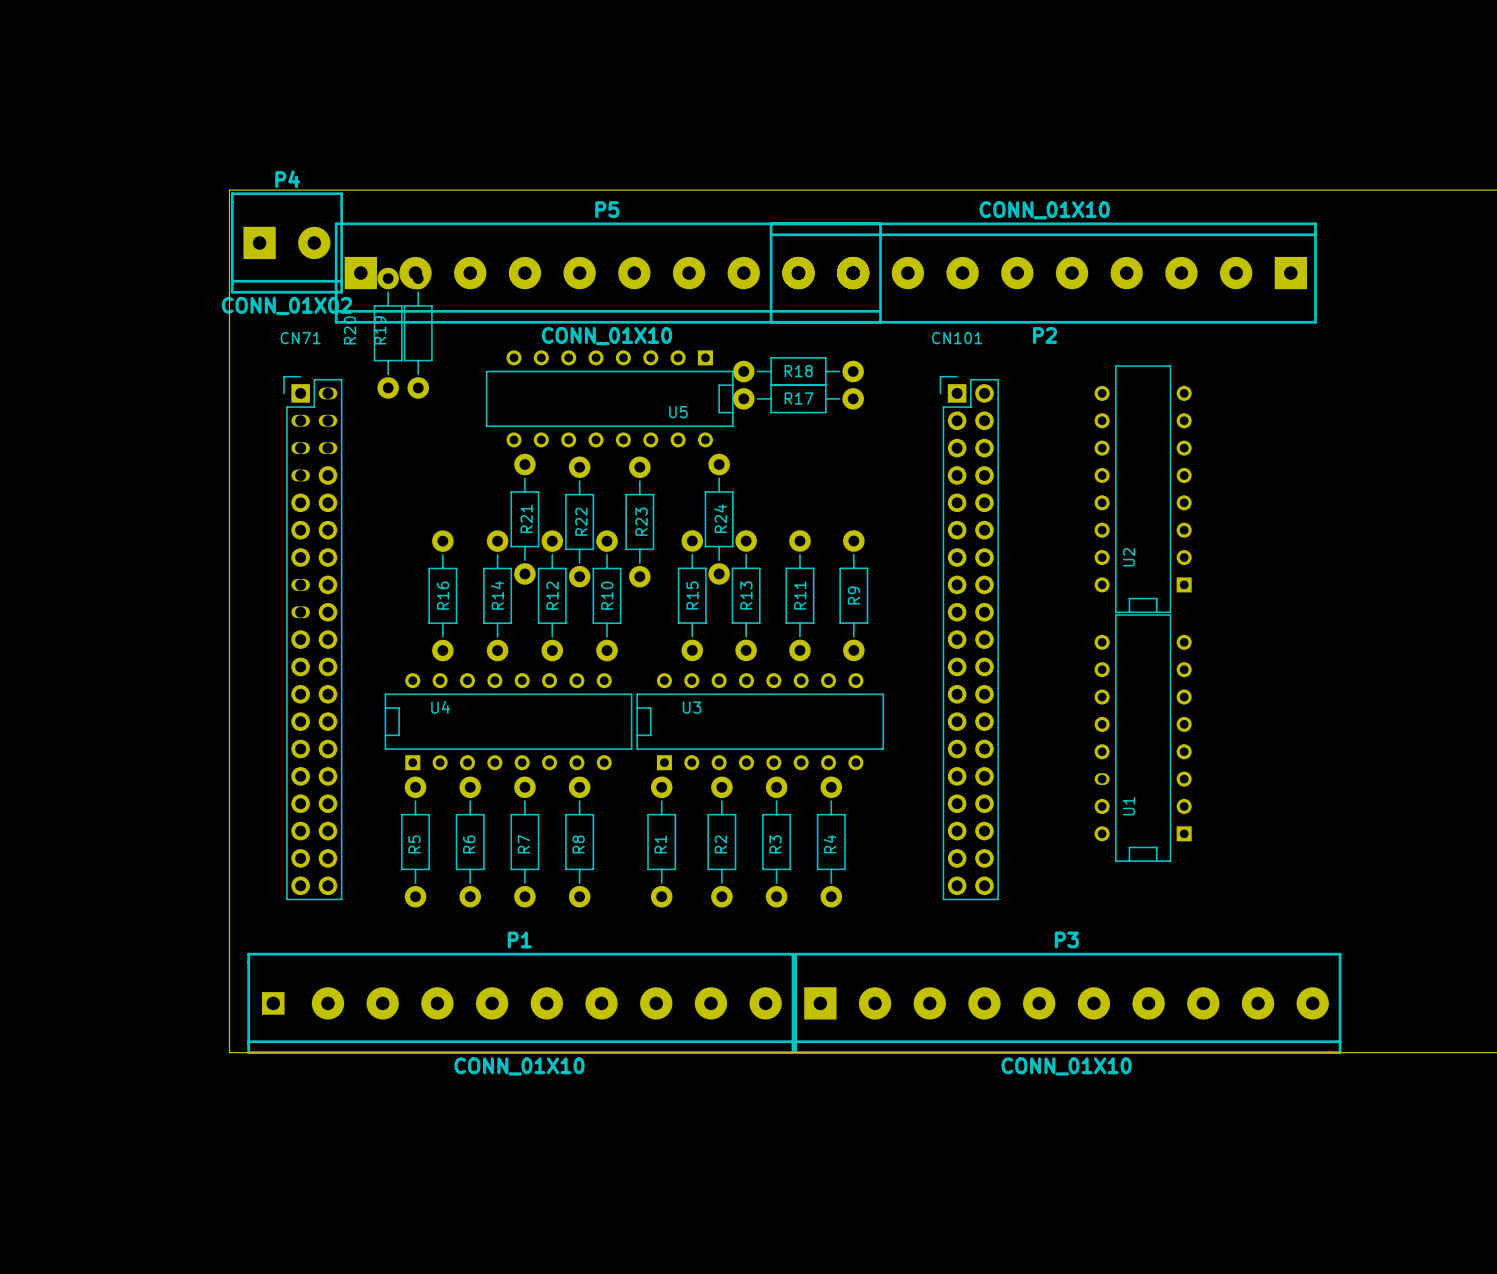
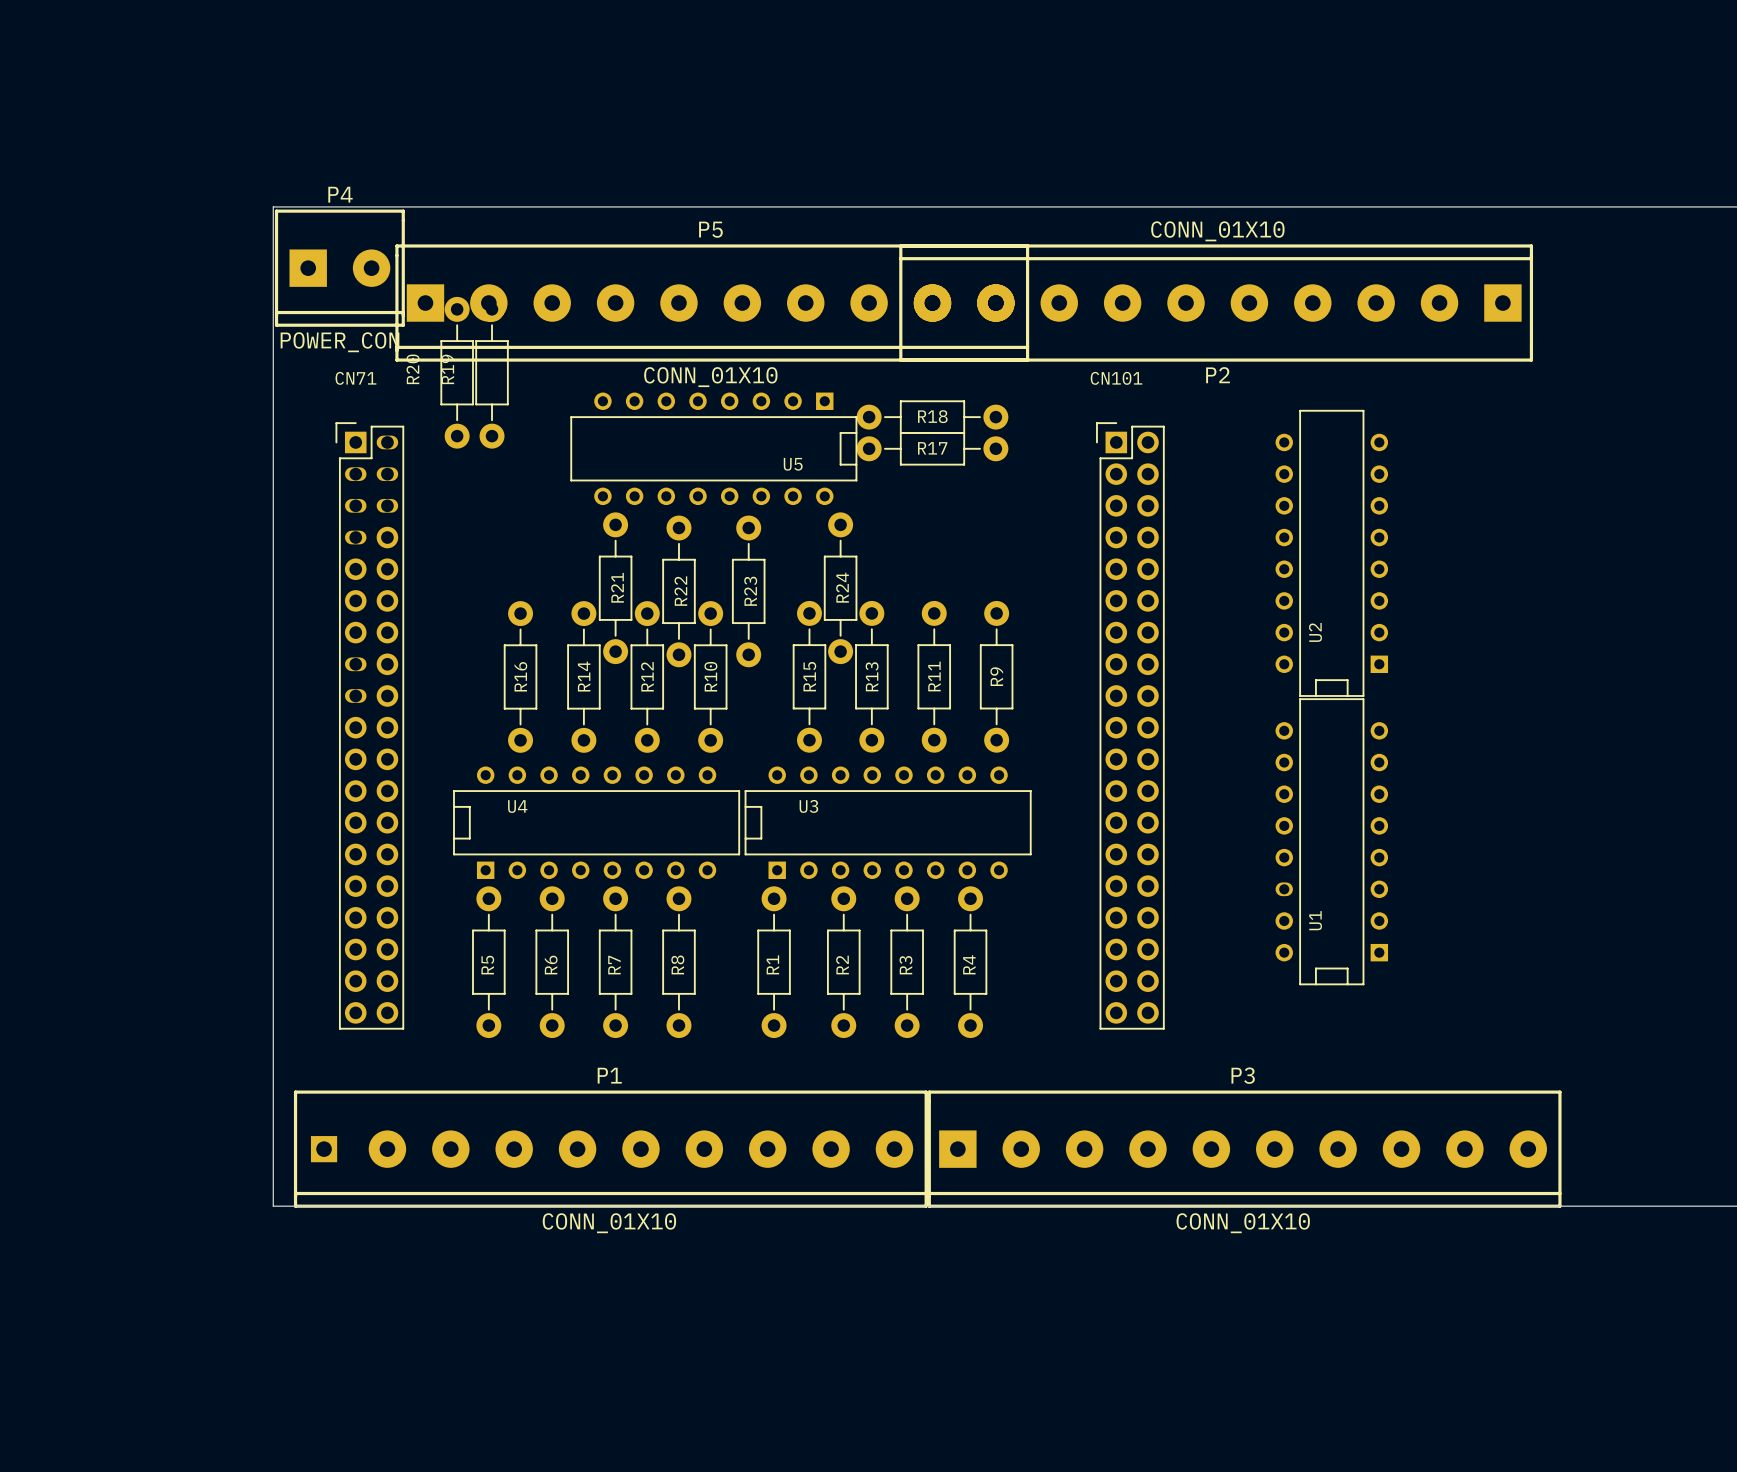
P4 value: CONN_01X02 (286, 306) -> POWER_CON (340, 342)

